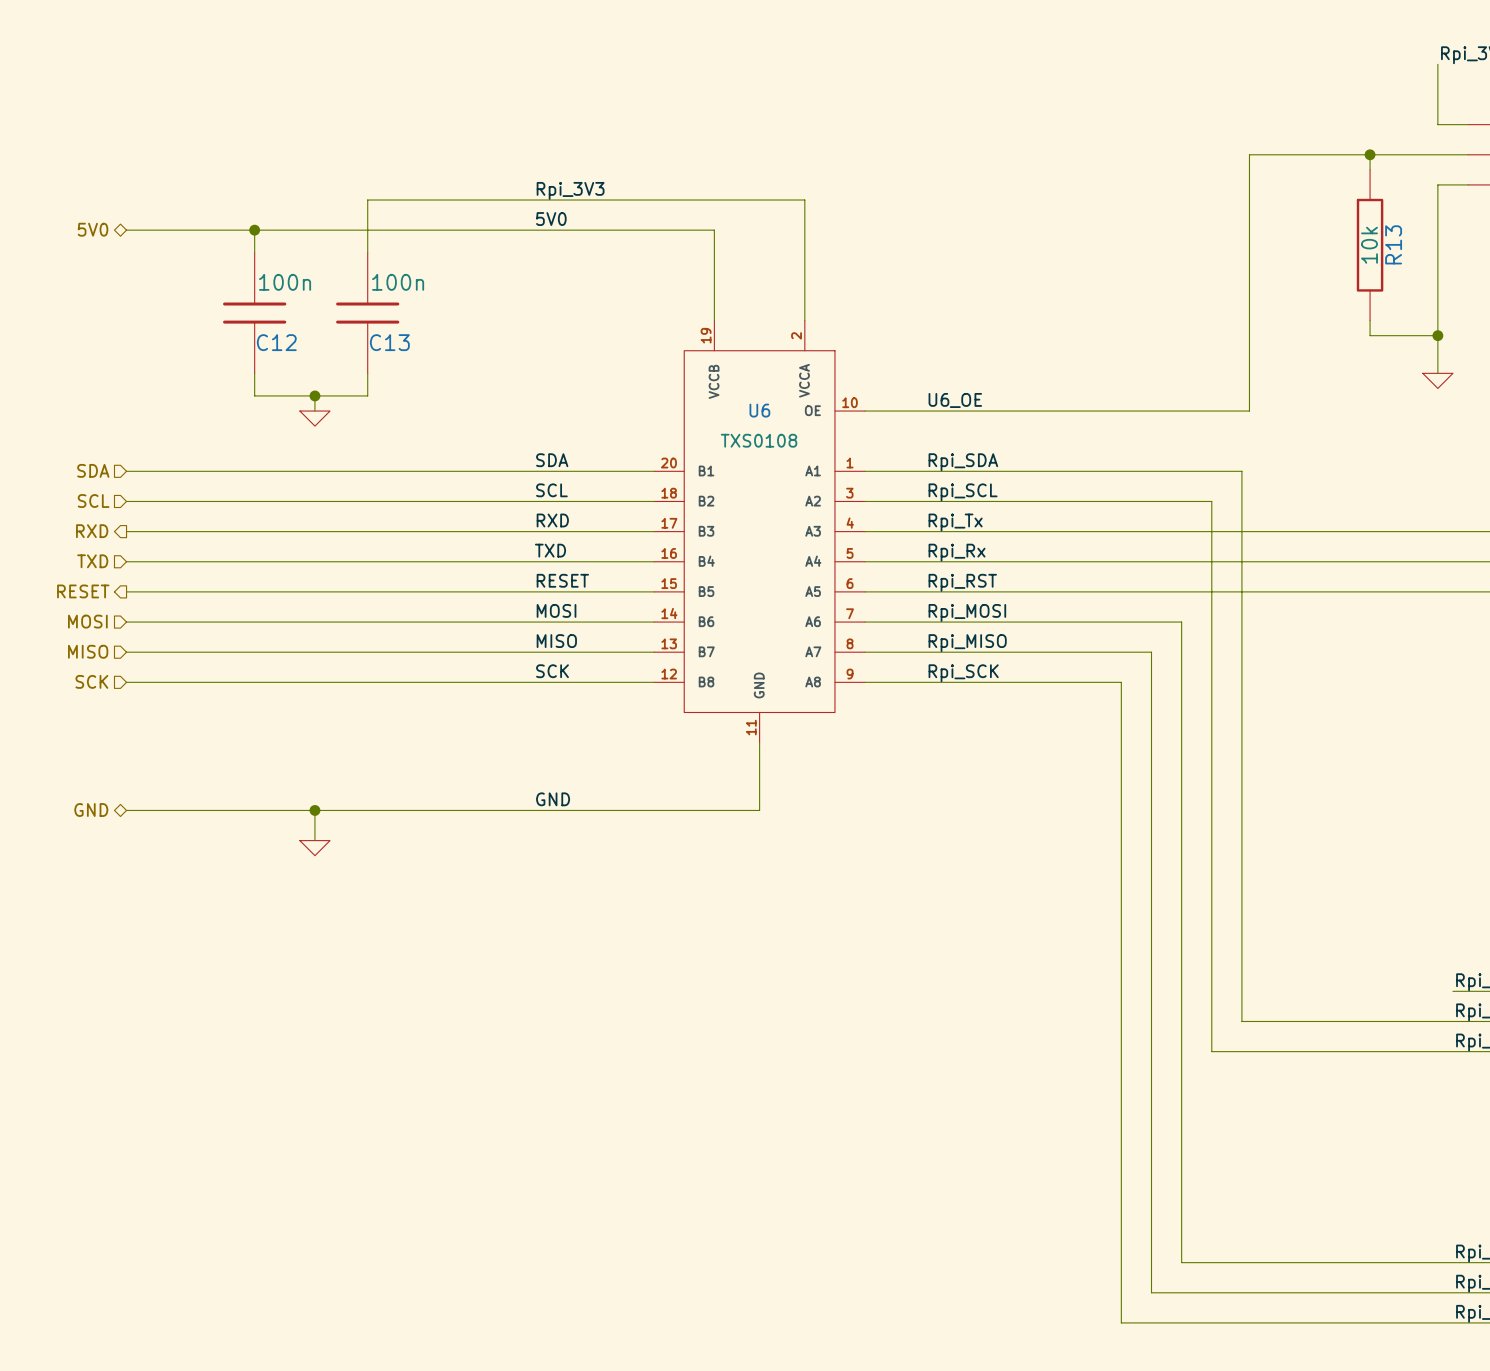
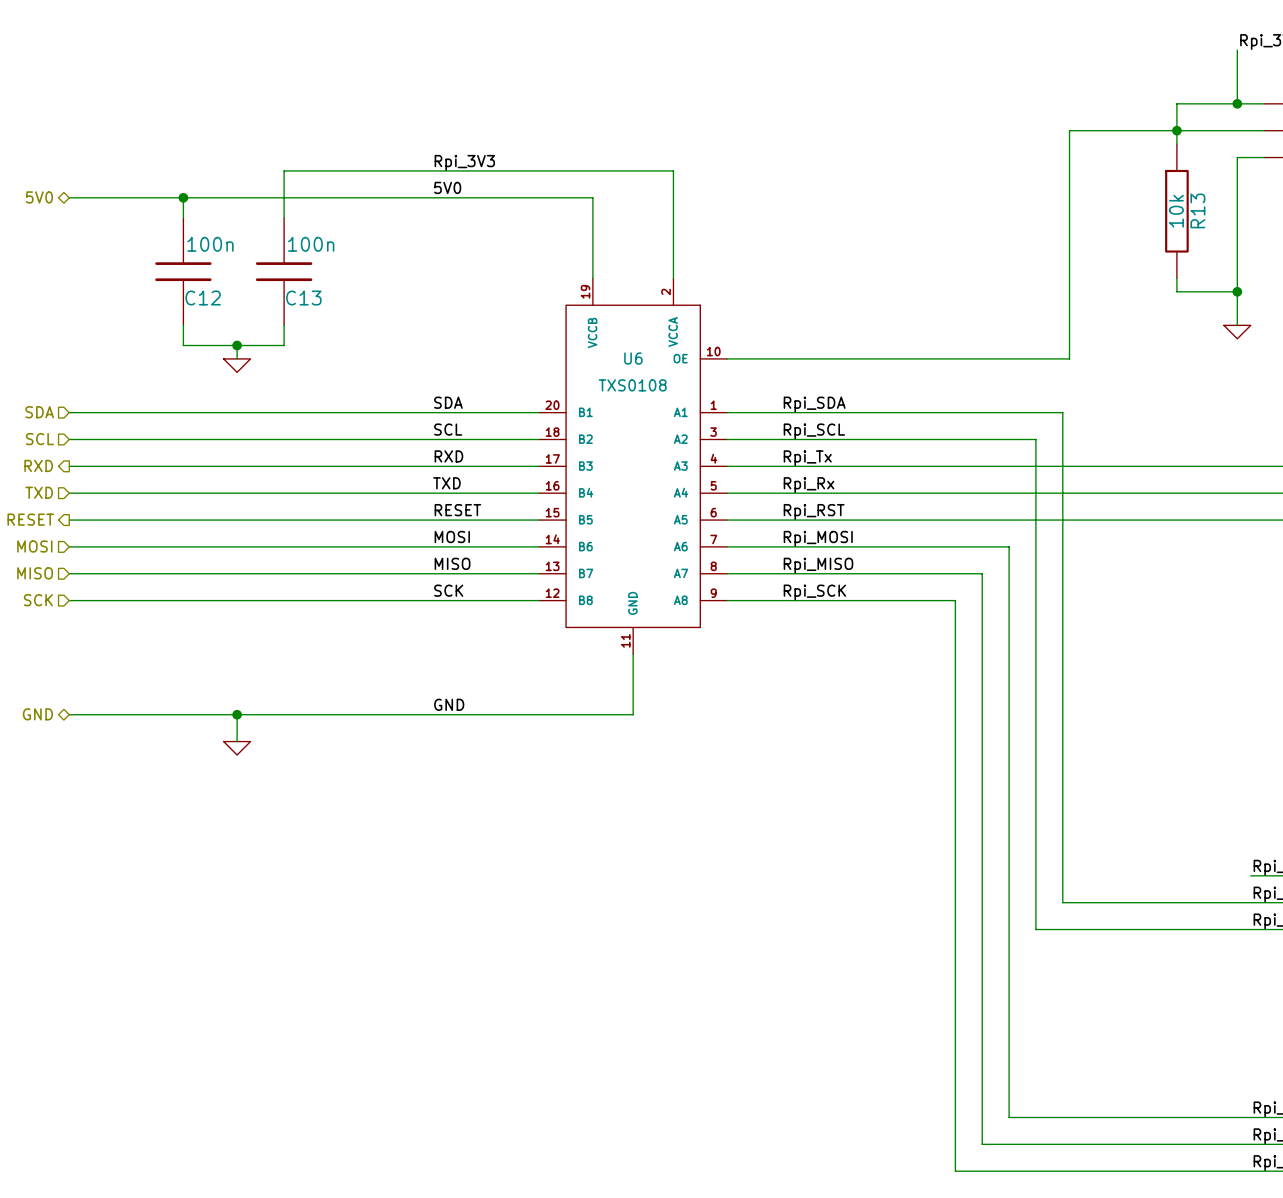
wire: none -> (1237, 103) (1176, 103) (1176, 130)
junction: none -> (1237, 103)
label: U6_OE (955, 400) -> none

